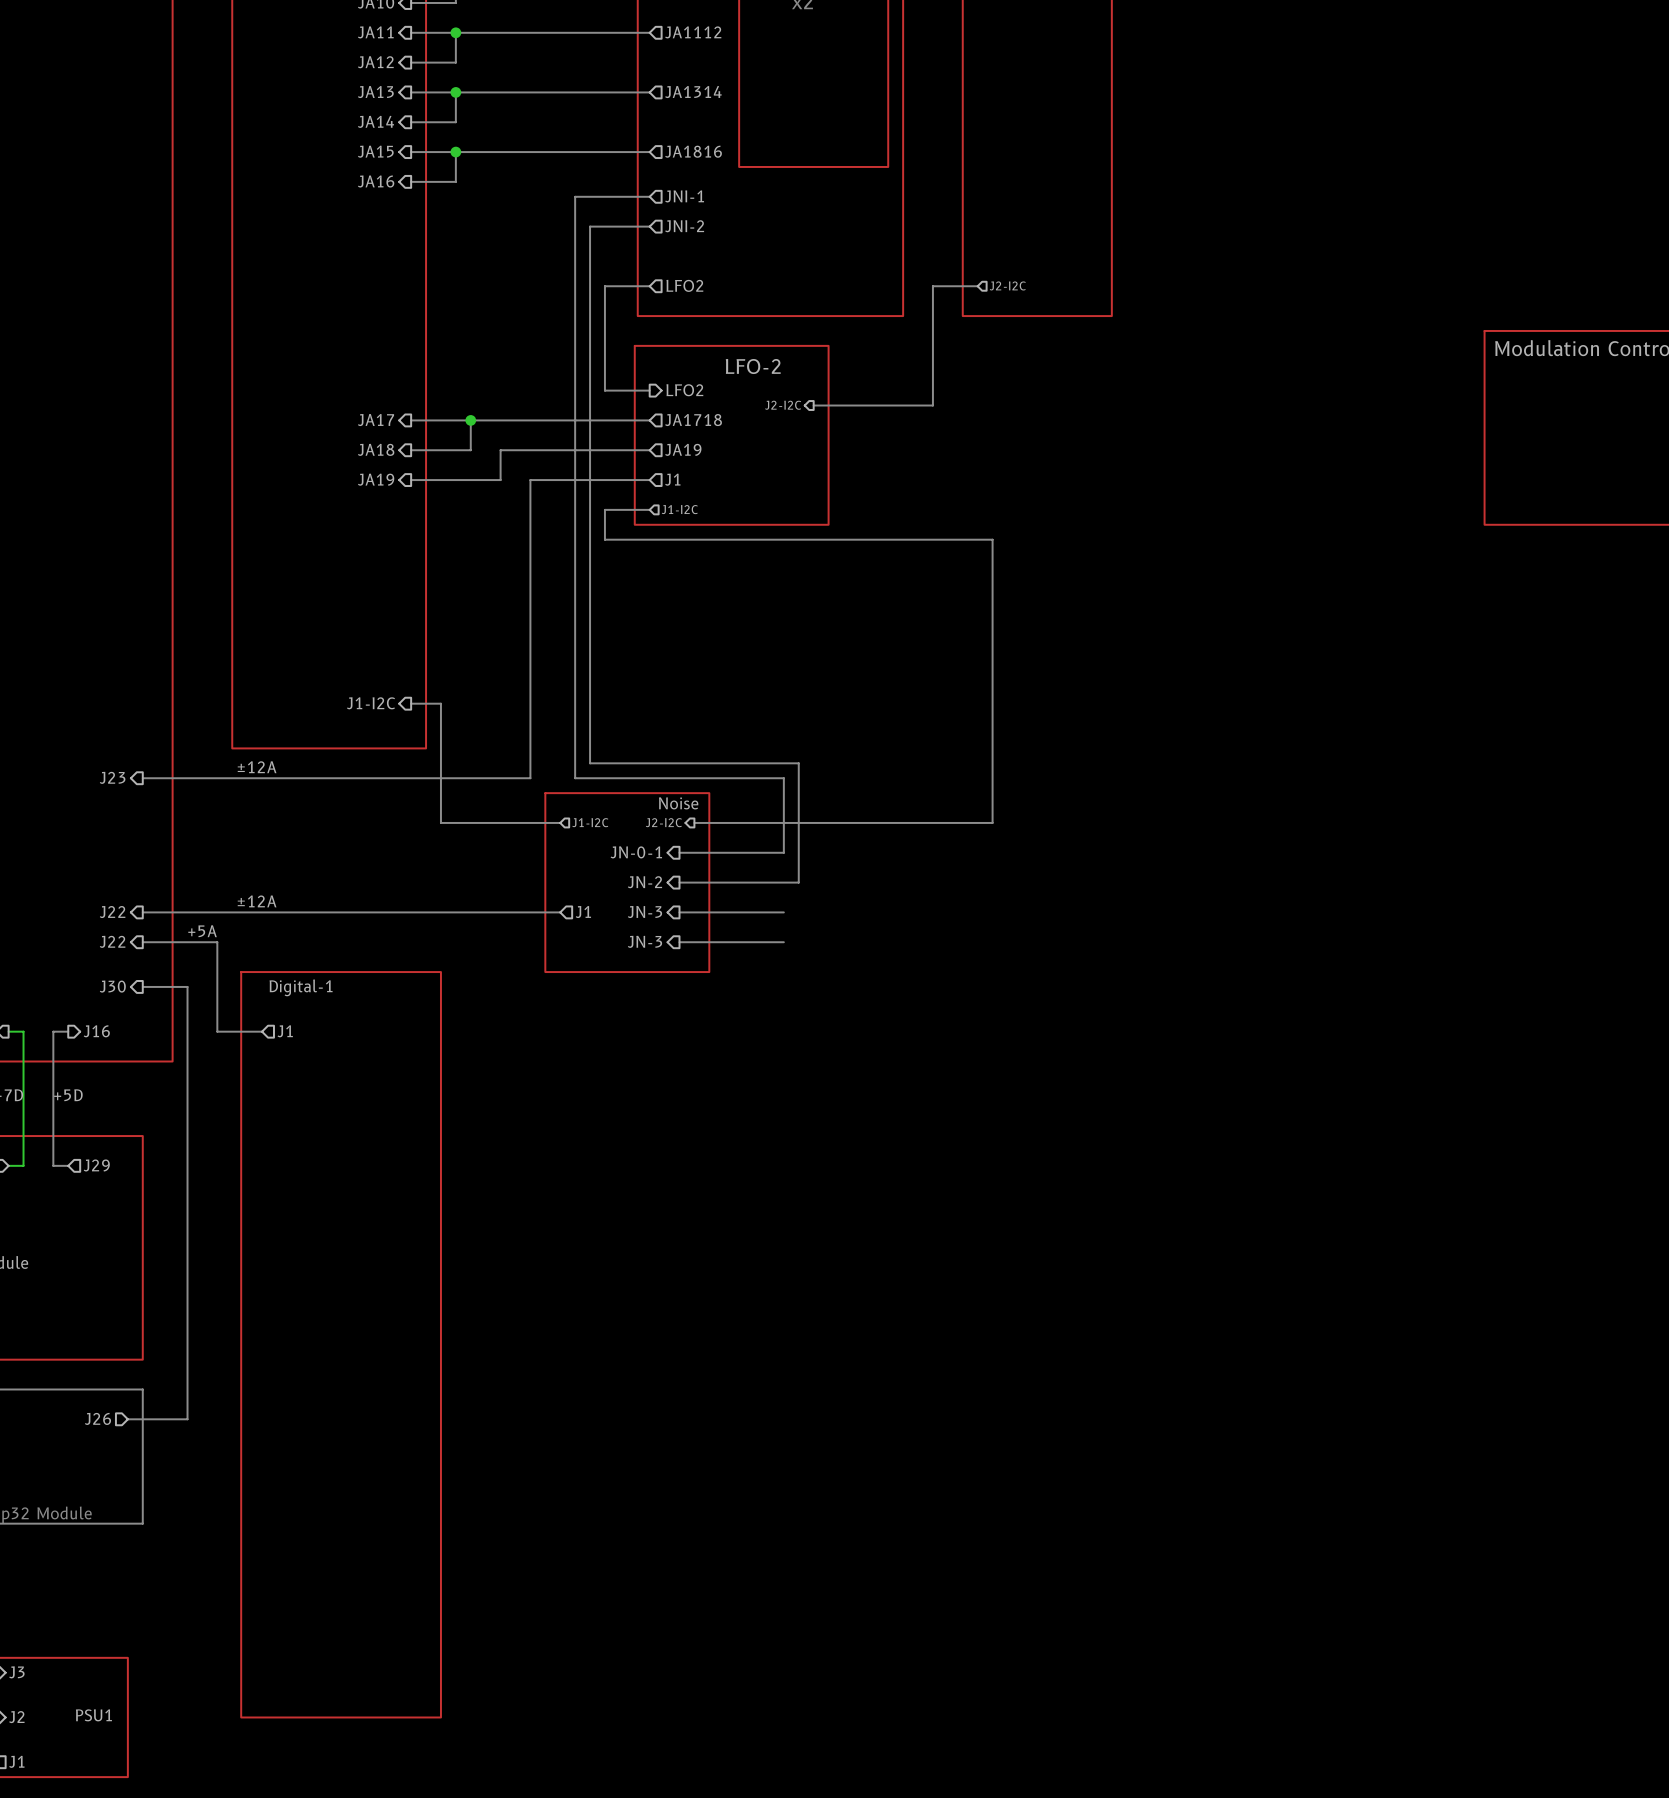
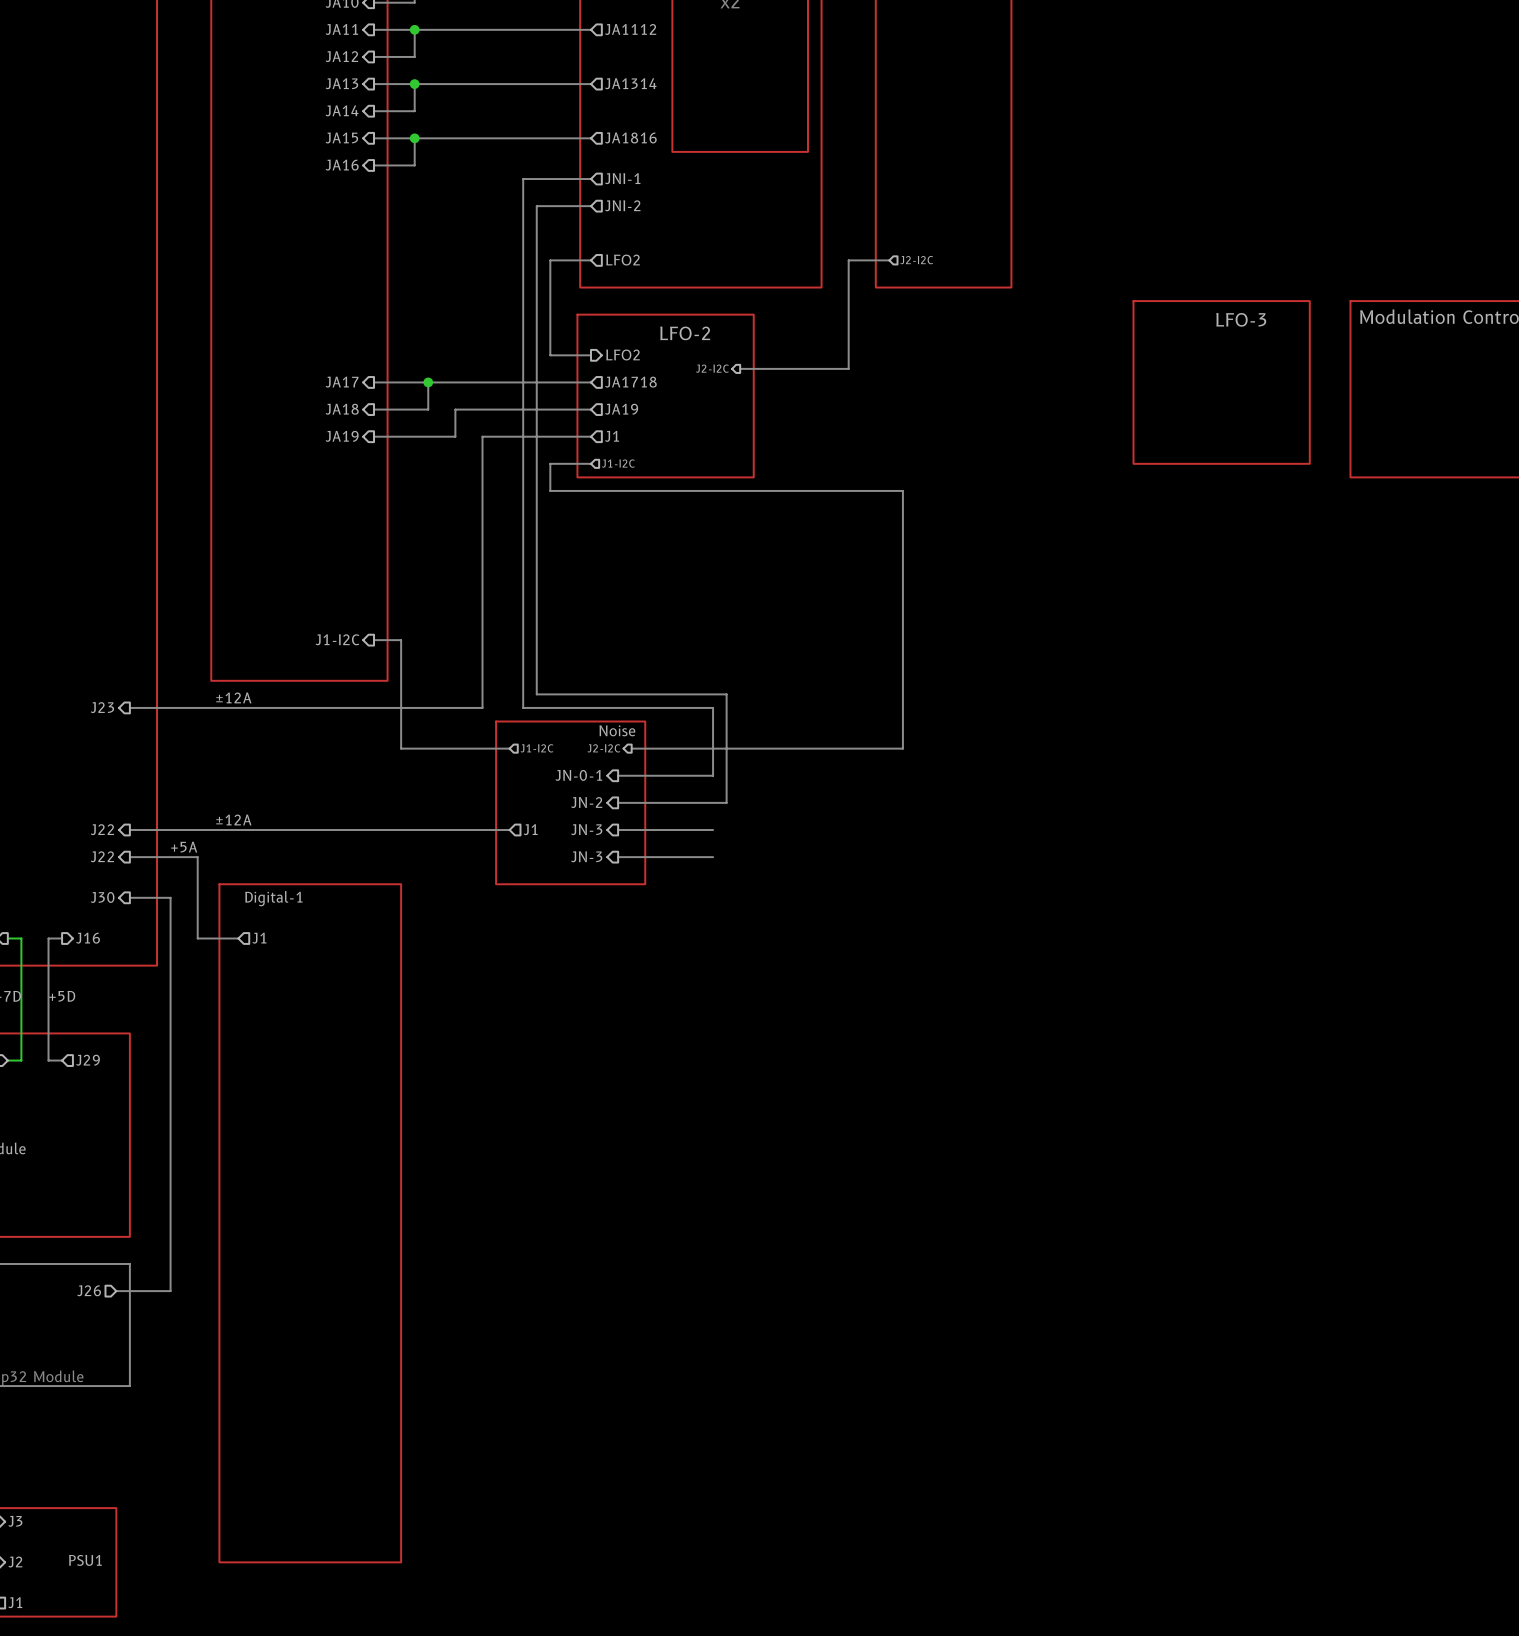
sheet LFO-3: none -> (1221, 382)

